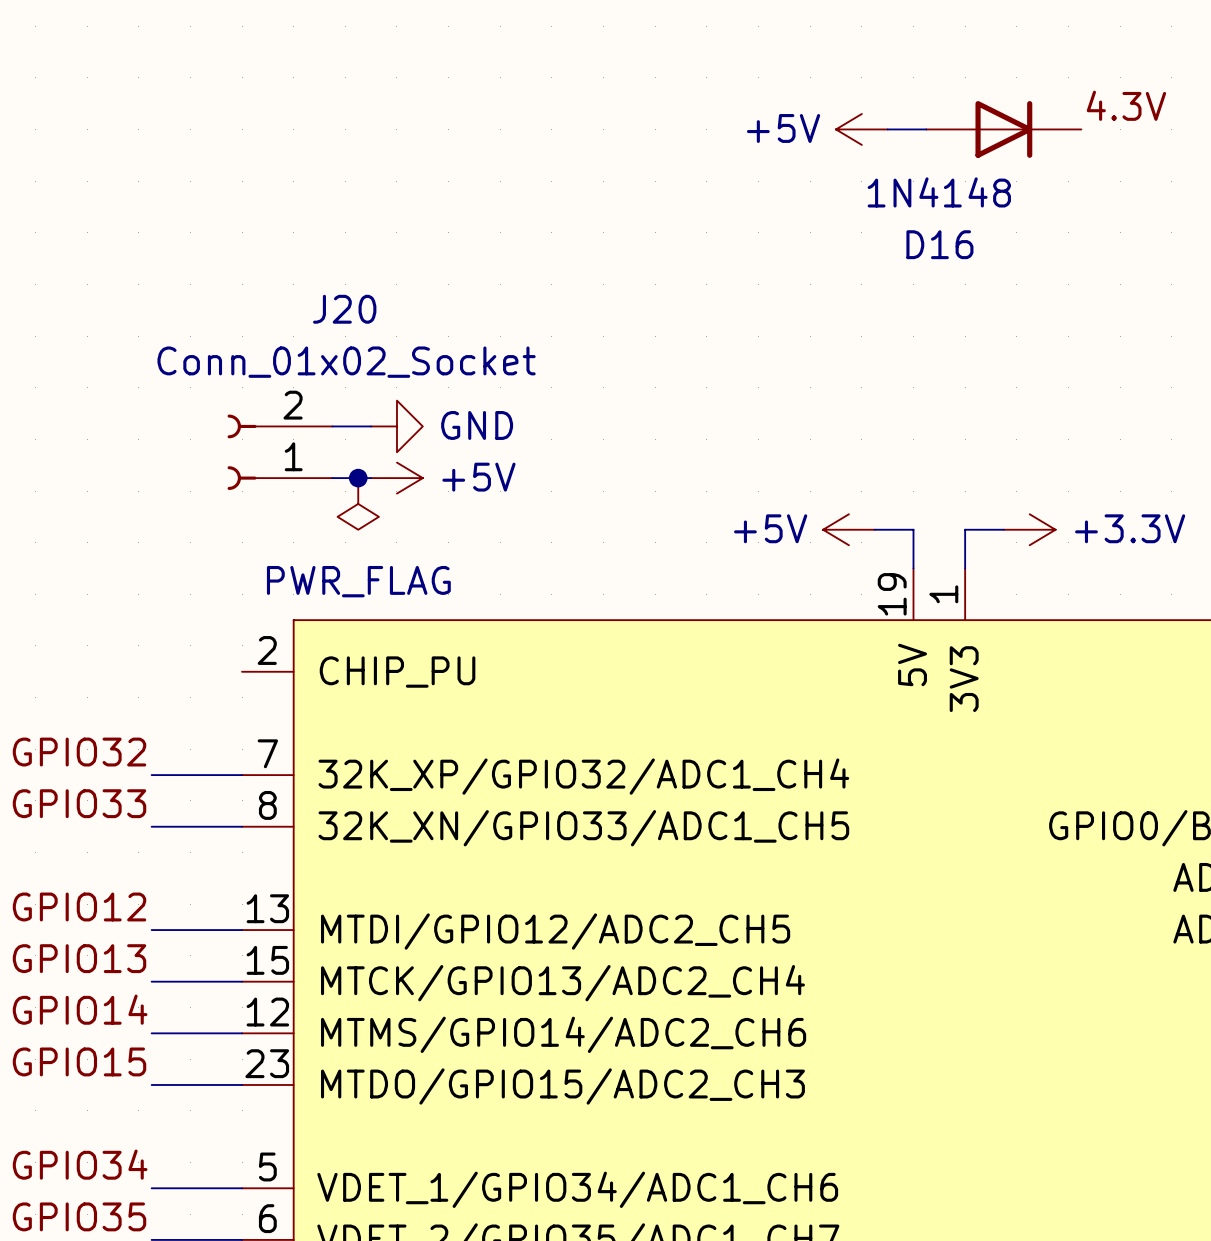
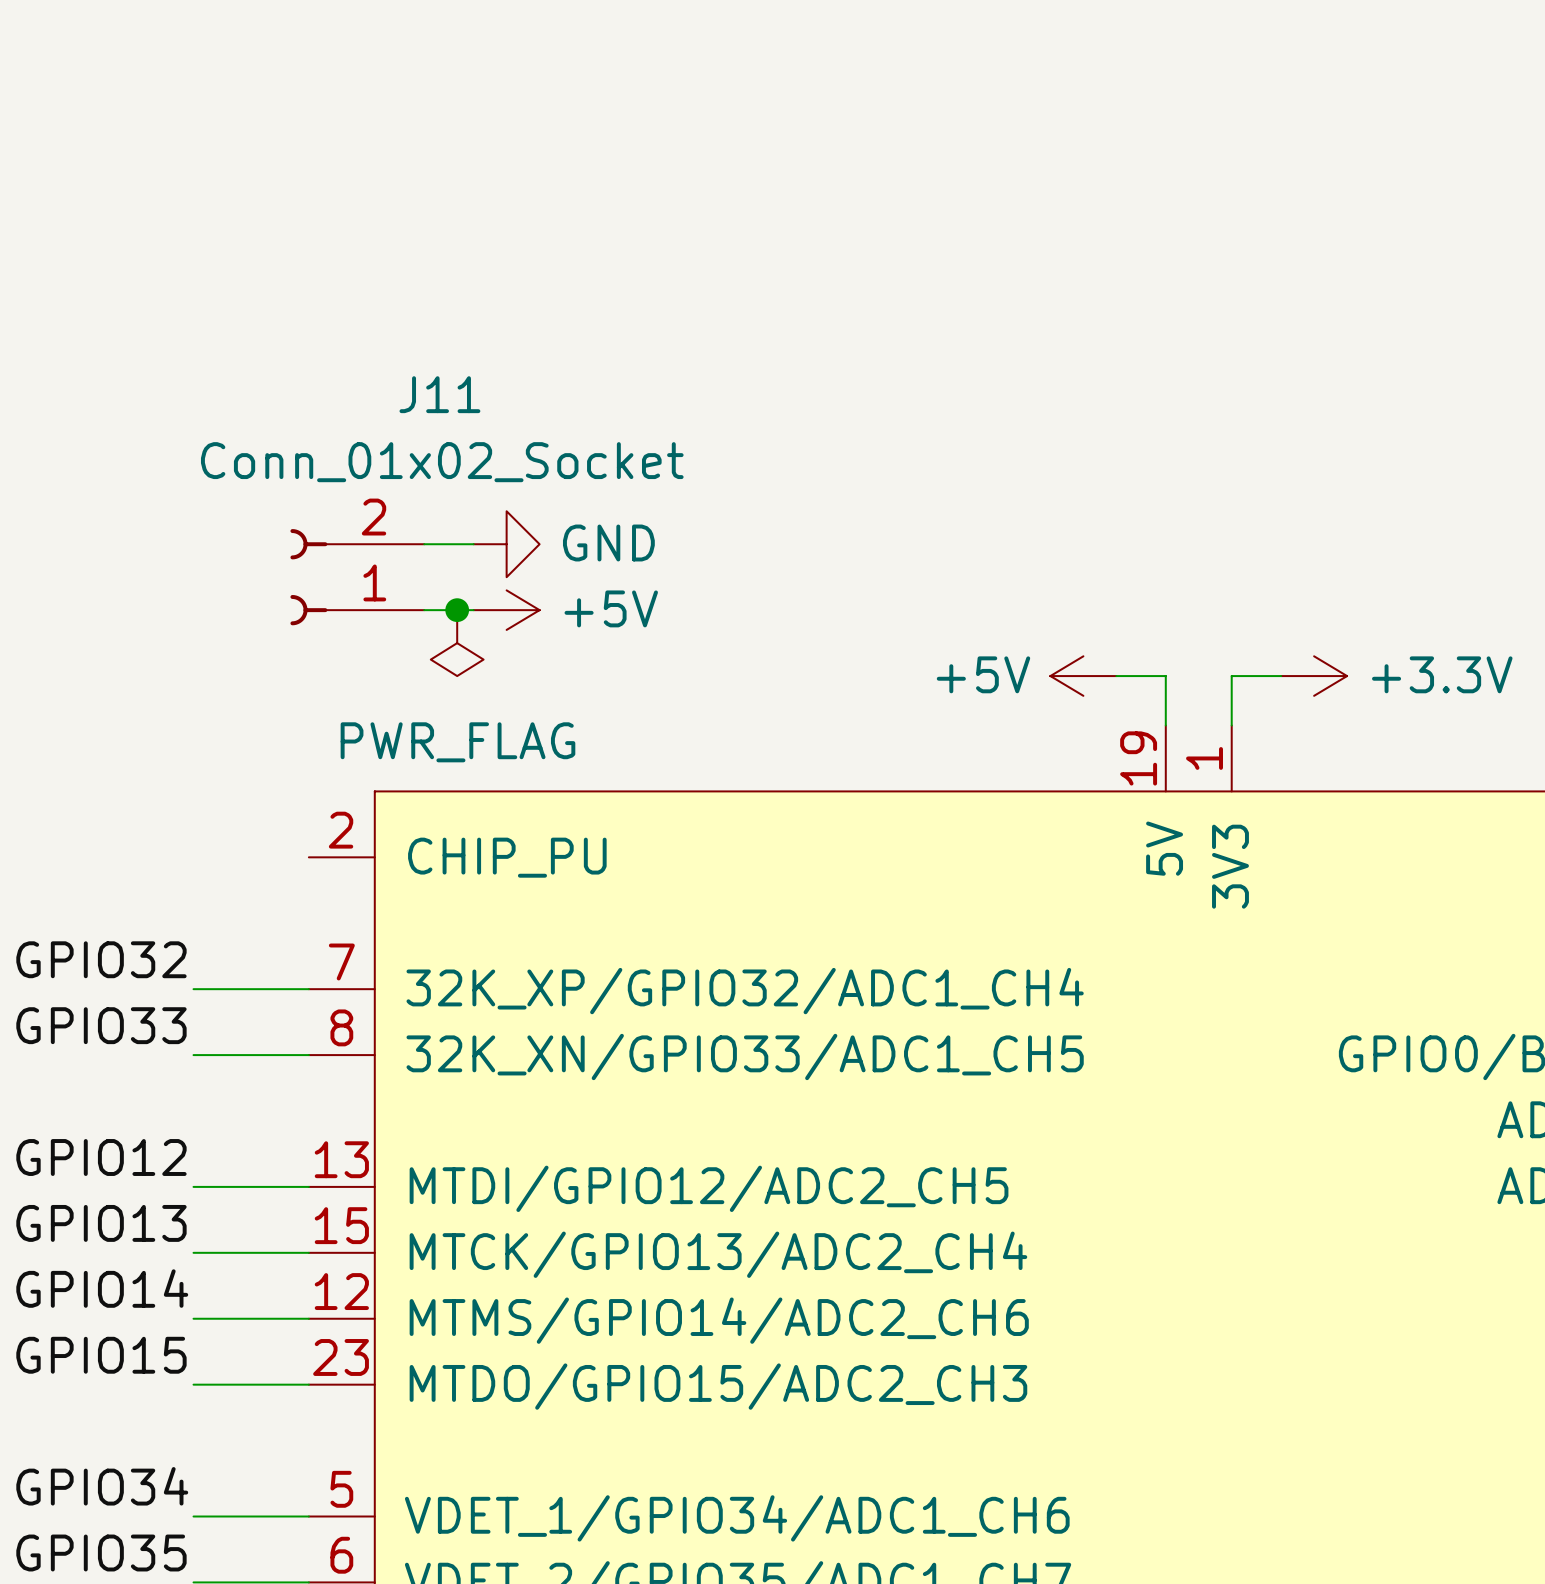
label: 4.3V (1126, 105) -> none
power symbol: +5V (861, 129) -> none
wire: (887, 129) (926, 129) -> none
D16: 1N4148 (1003, 129) -> none
J20 name: J20 (344, 309) -> J11 (439, 394)

